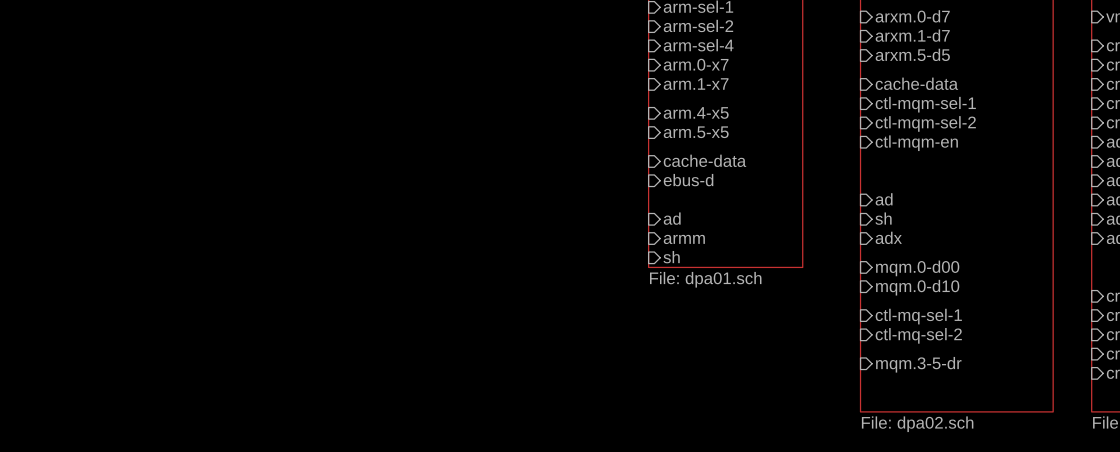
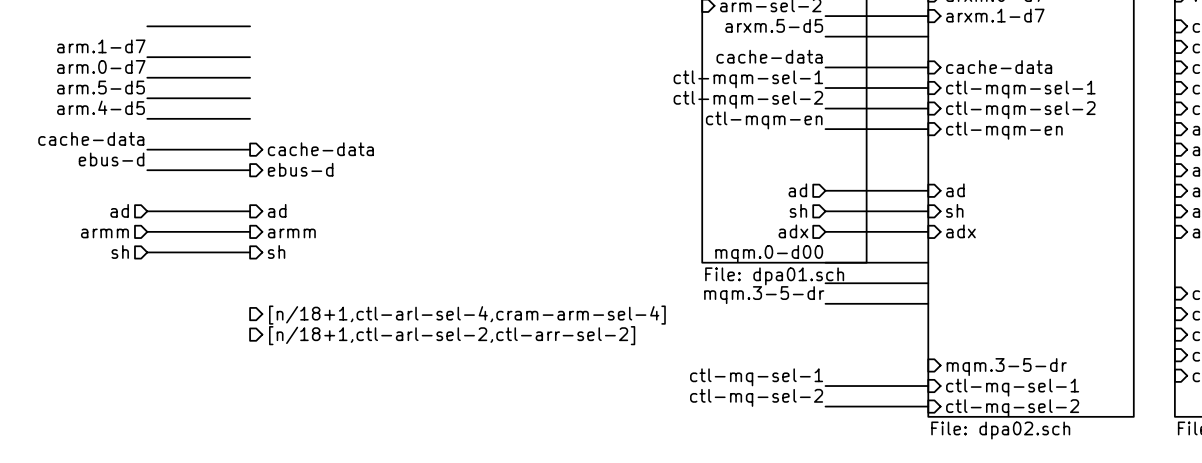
bus: none -> (825, 16) (928, 16)
bus: none -> (147, 26) (250, 26)
sheet pin: arm-sel-4 (698, 45) -> none
label: none -> arxm.5-d5 (774, 25)
sheet pin: arxm.5-d5 (912, 54) -> none
bus: none -> (825, 36) (928, 36)
label: none -> arm.1-d7 (101, 46)
sheet pin: arm.0-x7 (696, 64) -> none
bus: none -> (147, 57) (250, 57)
label: none -> cache-data (769, 56)
label: none -> arm.0-d7 (101, 66)
sheet pin: arm.1-x7 (696, 84) -> none
bus: none -> (825, 67) (928, 67)
bus: none -> (147, 77) (250, 77)
label: none -> ctl-mqm-sel-1 (748, 79)
label: none -> arm.5-d5 (100, 87)
bus: none -> (825, 88) (928, 88)
sheet pin: arm.4-x5 (696, 112) -> none
bus: none -> (147, 98) (250, 98)
label: none -> ctl-mqm-sel-2 (748, 99)
label: none -> arm.4-d5 (100, 107)
bus: none -> (825, 108) (928, 108)
bus: none -> (147, 118) (250, 118)
sheet pin: arm.5-x5 (696, 132) -> none
label: none -> ctl-mqm-en (764, 120)
bus: none -> (825, 129) (928, 129)
label: none -> cache-data (91, 138)
sheet pin: none -> cache-data (320, 149)
sheet pin: cache-data (704, 160) -> none
bus: none -> (147, 149) (250, 149)
label: none -> ebus-d (111, 159)
bus: none -> (147, 170) (250, 170)
sheet pin: none -> ebus-d (300, 169)
sheet pin: ebus-d (688, 180) -> none
hierarchical label: none -> ad (797, 190)
bus: none -> (825, 190) (928, 190)
hierarchical label: none -> ad (119, 210)
sheet pin: none -> ad (277, 210)
sheet pin: ad (672, 218) -> none
hierarchical label: none -> sh (798, 210)
bus: none -> (147, 211) (250, 211)
bus: none -> (825, 211) (928, 211)
hierarchical label: none -> adx (793, 231)
bus: none -> (147, 231) (250, 231)
bus: none -> (825, 231) (928, 231)
hierarchical label: none -> armm (104, 233)
sheet pin: none -> armm (291, 233)
sheet pin: armm (684, 239) -> none
hierarchical label: none -> sh (120, 251)
bus: none -> (147, 252) (250, 252)
sheet pin: none -> sh (276, 251)
sheet pin: sh (671, 257) -> none
label: none -> mqm.0-d00 (769, 254)
bus: none -> (825, 262) (928, 262)
sheet pin: mqm.0-d00 (917, 268) -> none
bus: none -> (825, 283) (928, 283)
sheet pin: mqm.0-d10 (917, 287) -> none
label: none -> mqm.3-5-dr (764, 295)
bus: none -> (825, 303) (928, 303)
sheet pin: none -> [n/18+1,ctl-arl-sel-4,cram-arm-sel-4] (467, 315)
sheet pin position: ctl-mq-sel-1 (918, 316) -> ctl-mq-sel-1 (1012, 387)
sheet pin: none -> [n/18+1,ctl-arl-sel-2,ctl-arr-sel-2] (452, 335)
sheet pin position: ctl-mq-sel-2 (918, 335) -> ctl-mq-sel-2 (1012, 408)
label: none -> ctl-mq-sel-1 (756, 377)
bus: none -> (825, 386) (928, 386)
label: none -> ctl-mq-sel-2 (756, 397)
bus: none -> (825, 406) (928, 406)

